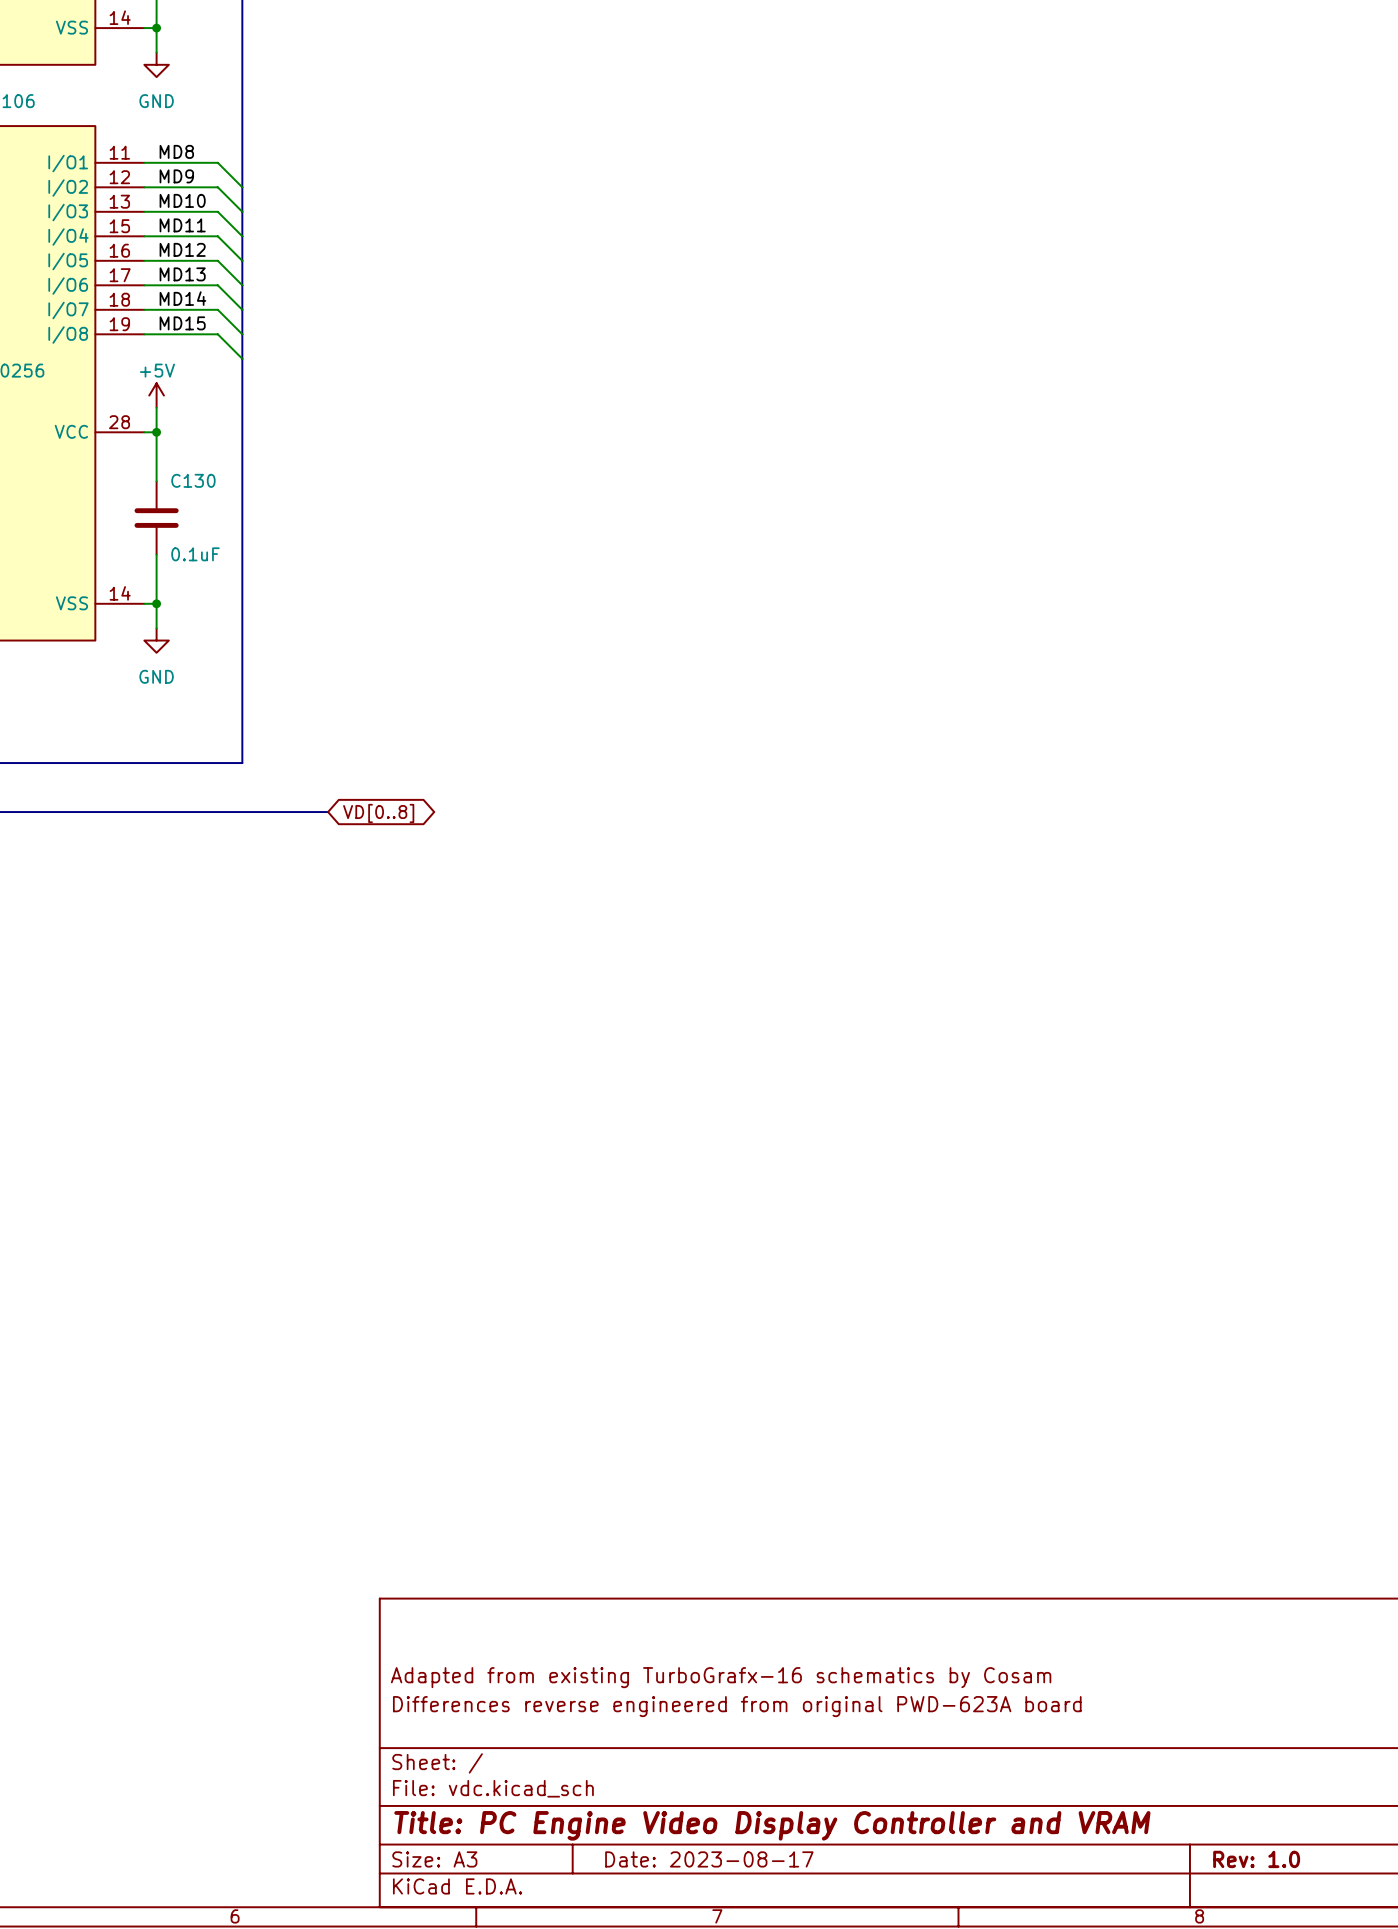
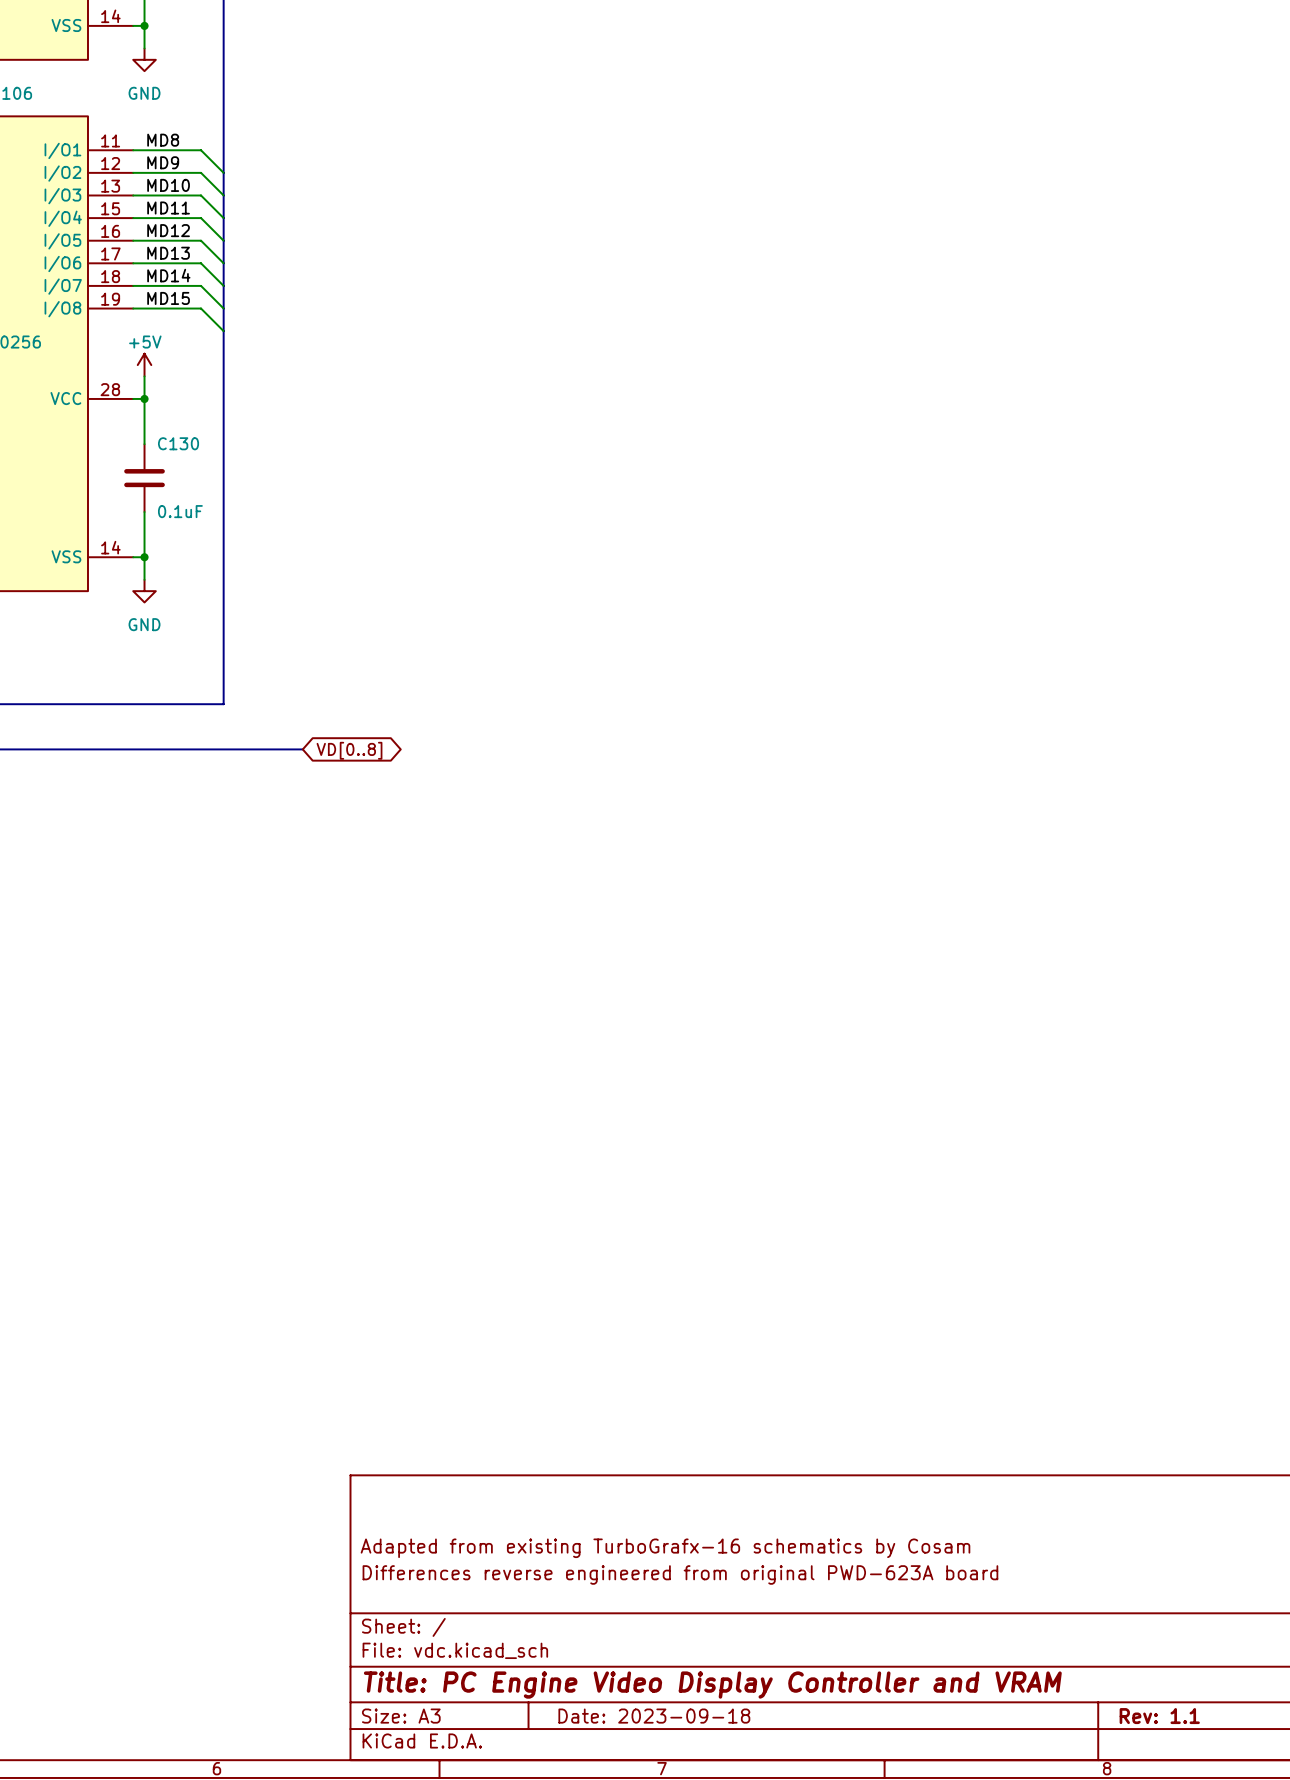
title block: Date: 2023-08-17 (709, 1859) -> Date: 2023-09-18 (654, 1716)
title block: Rev: 1.0 (1256, 1859) -> Rev: 1.1 (1159, 1716)

